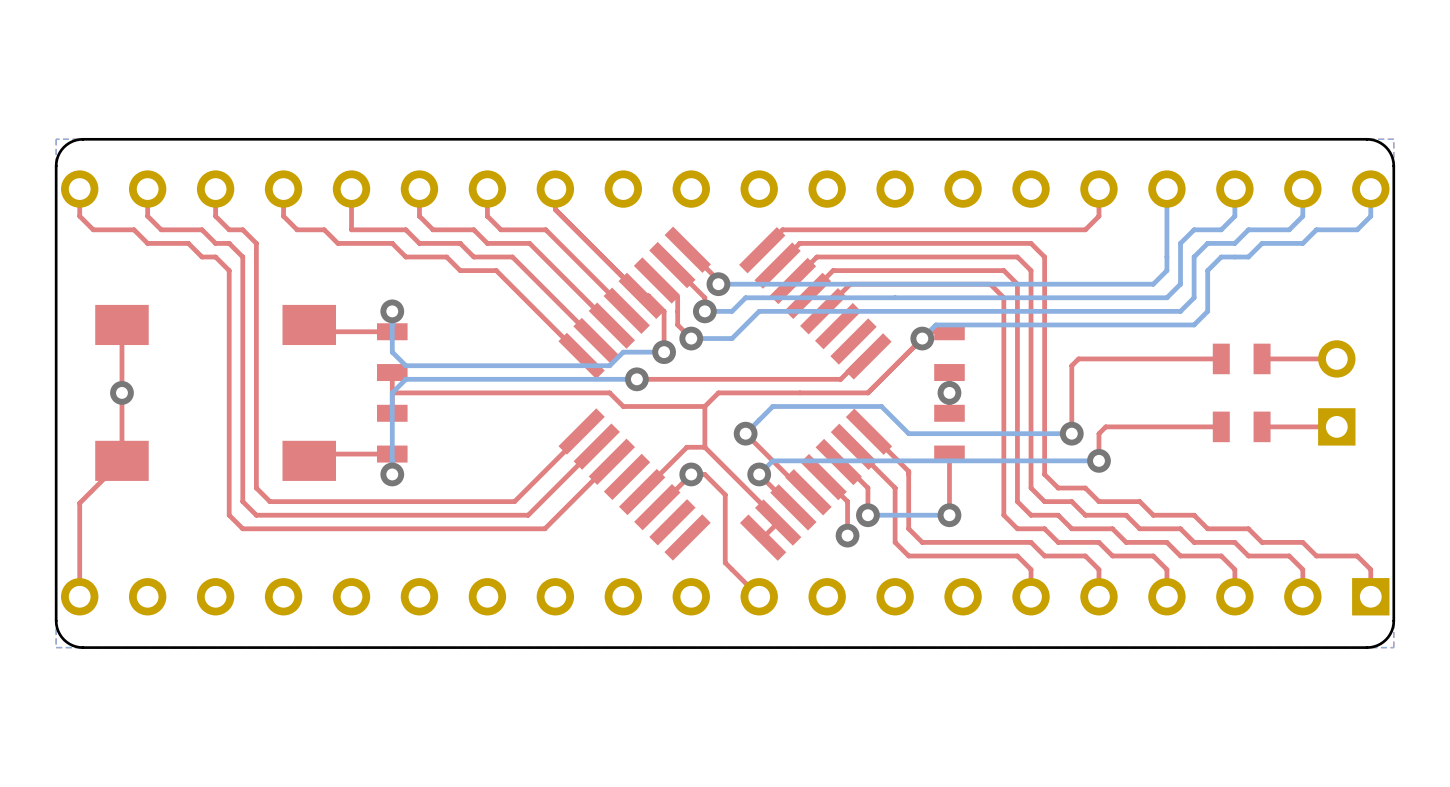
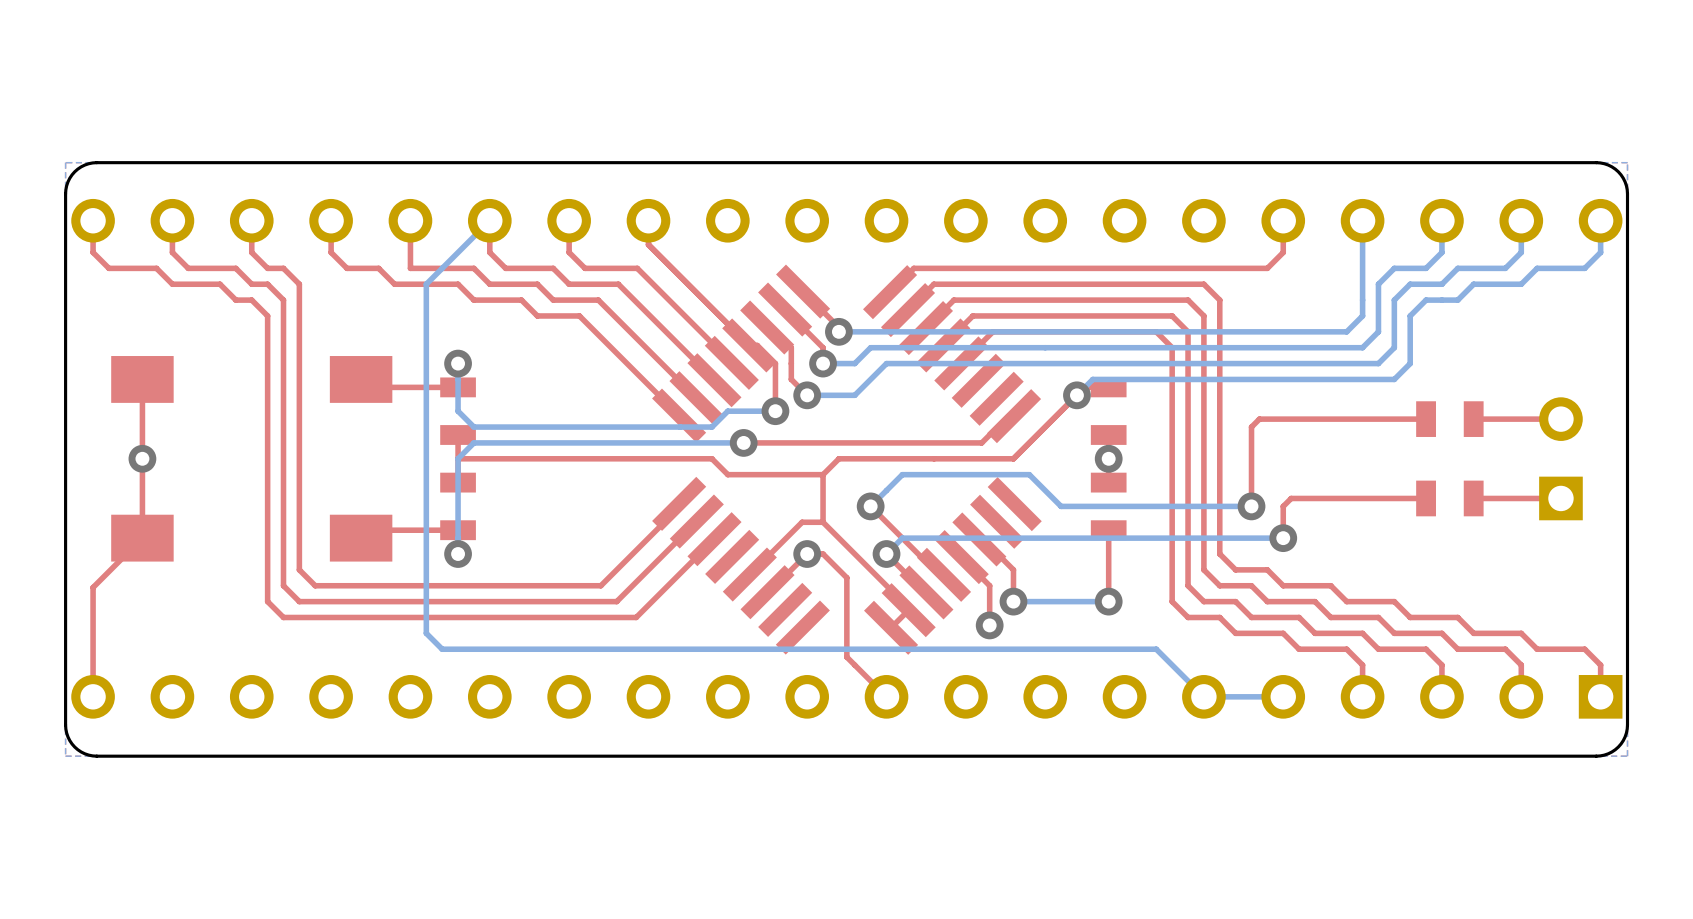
bottom track: none -> (489, 220) (426, 284) (426, 633) (442, 649) (1156, 649) (1203, 696) (1283, 696)
top track: (869, 431) (908, 471) (908, 528) (922, 542) (1031, 542) (1044, 555) (1085, 555) (1098, 569) (1098, 596) -> none
top track: (853, 446) (895, 488) (895, 542) (908, 555) (1017, 555) (1031, 569) (1031, 596) -> none

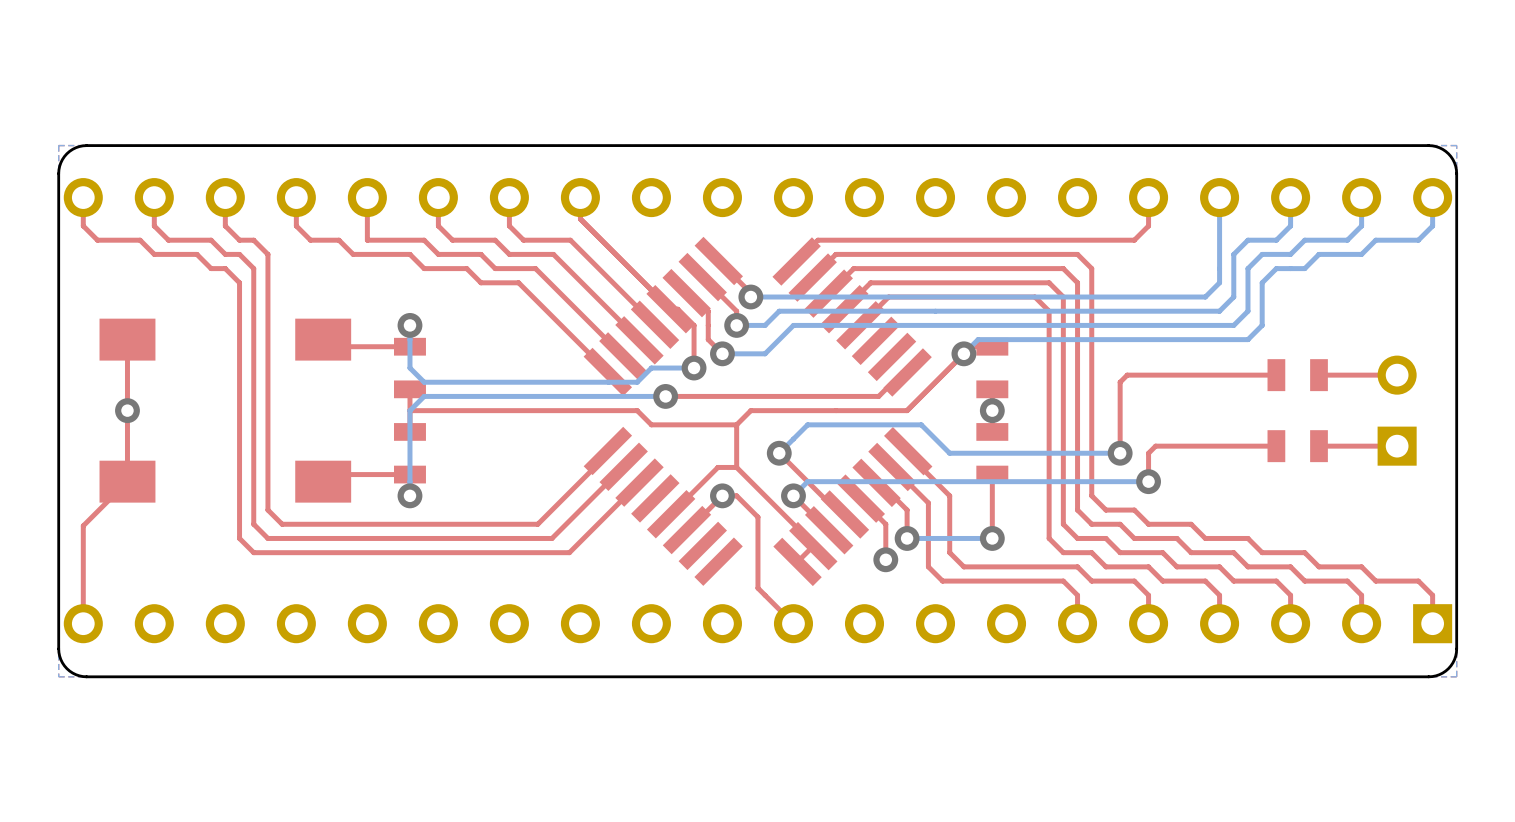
bottom track: (489, 220) (426, 284) (426, 633) (442, 649) (1156, 649) (1203, 696) (1283, 696) -> none
top track: none -> (908, 451) (908, 454) (949, 495) (949, 552) (963, 566) (1077, 566) (1091, 581) (1134, 581) (1148, 595) (1148, 623)
top track: none -> (892, 467) (928, 502) (928, 566) (942, 581) (1063, 581) (1077, 595) (1077, 623)

